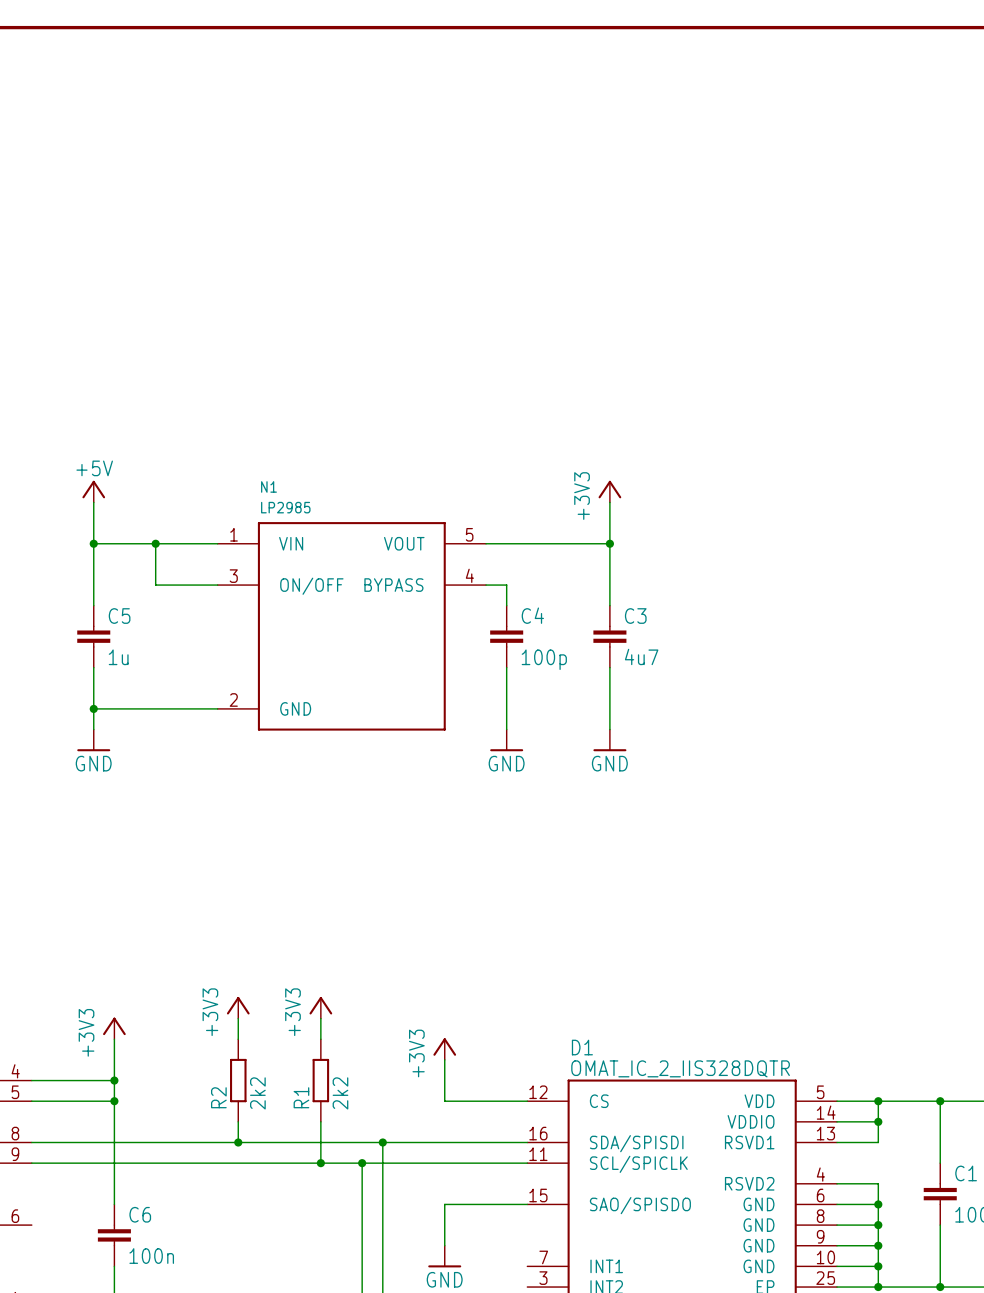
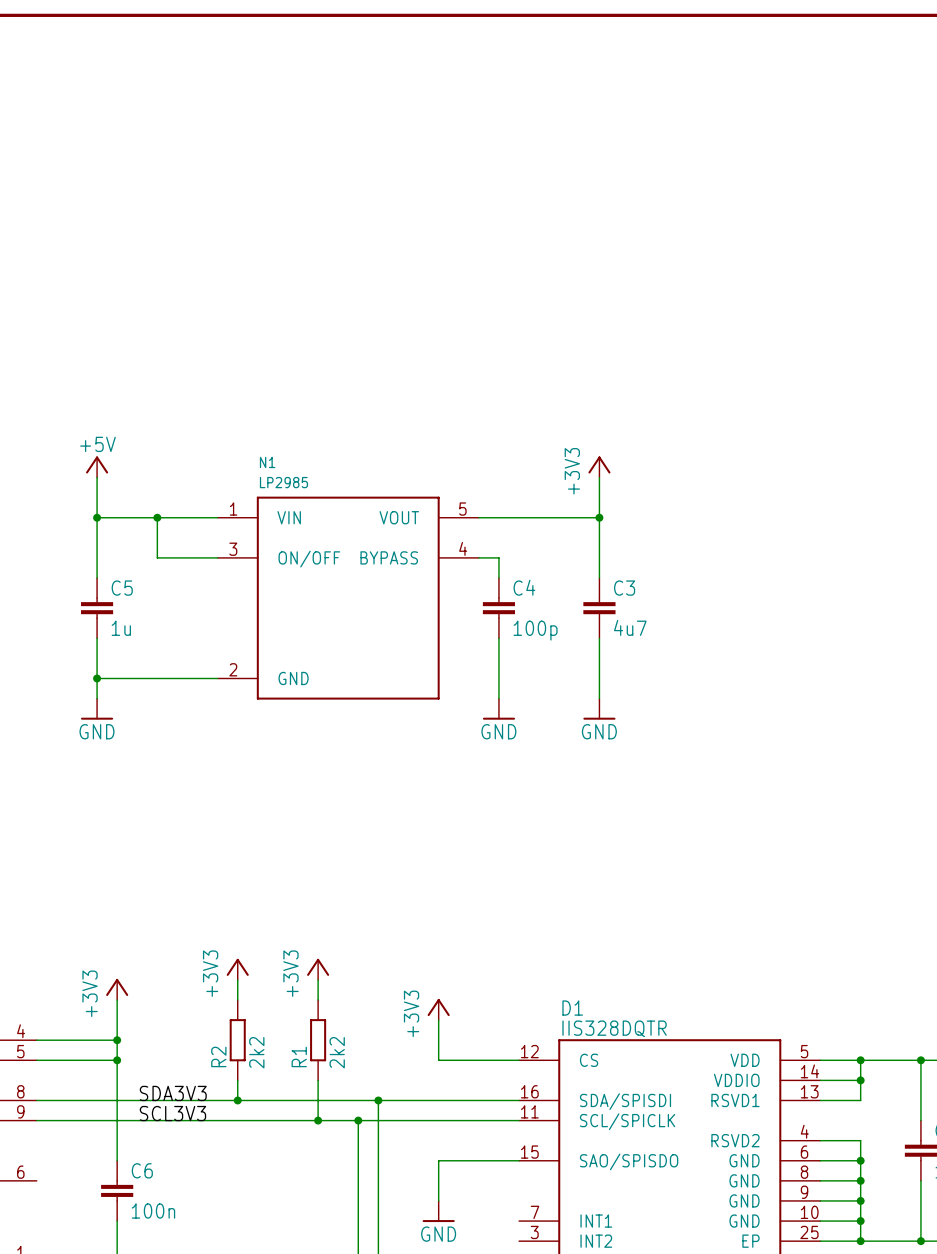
D1 value: OMAT_IC_2_IIS328DQTR (680, 1068) -> IIS328DQTR (614, 1028)
label: none -> SDA3V3 (173, 1093)
label: none -> SCL3V3 (172, 1113)

